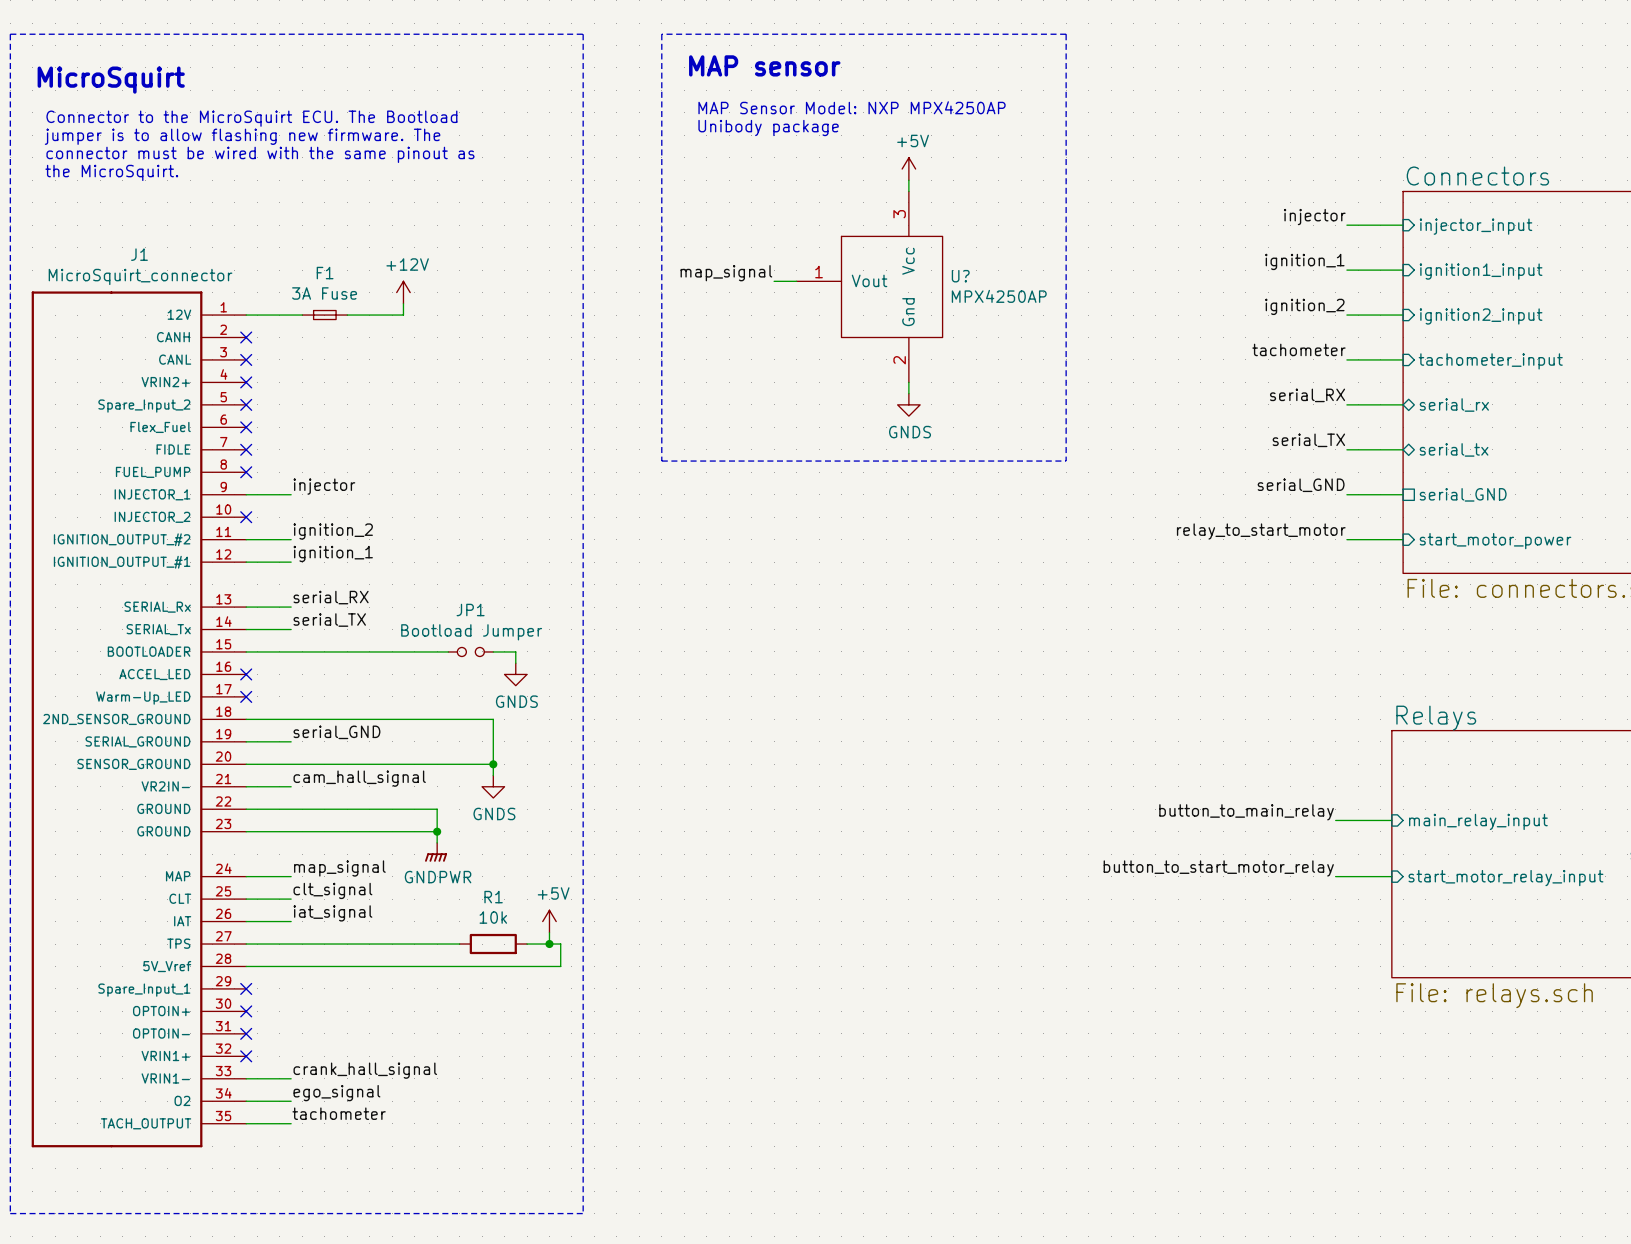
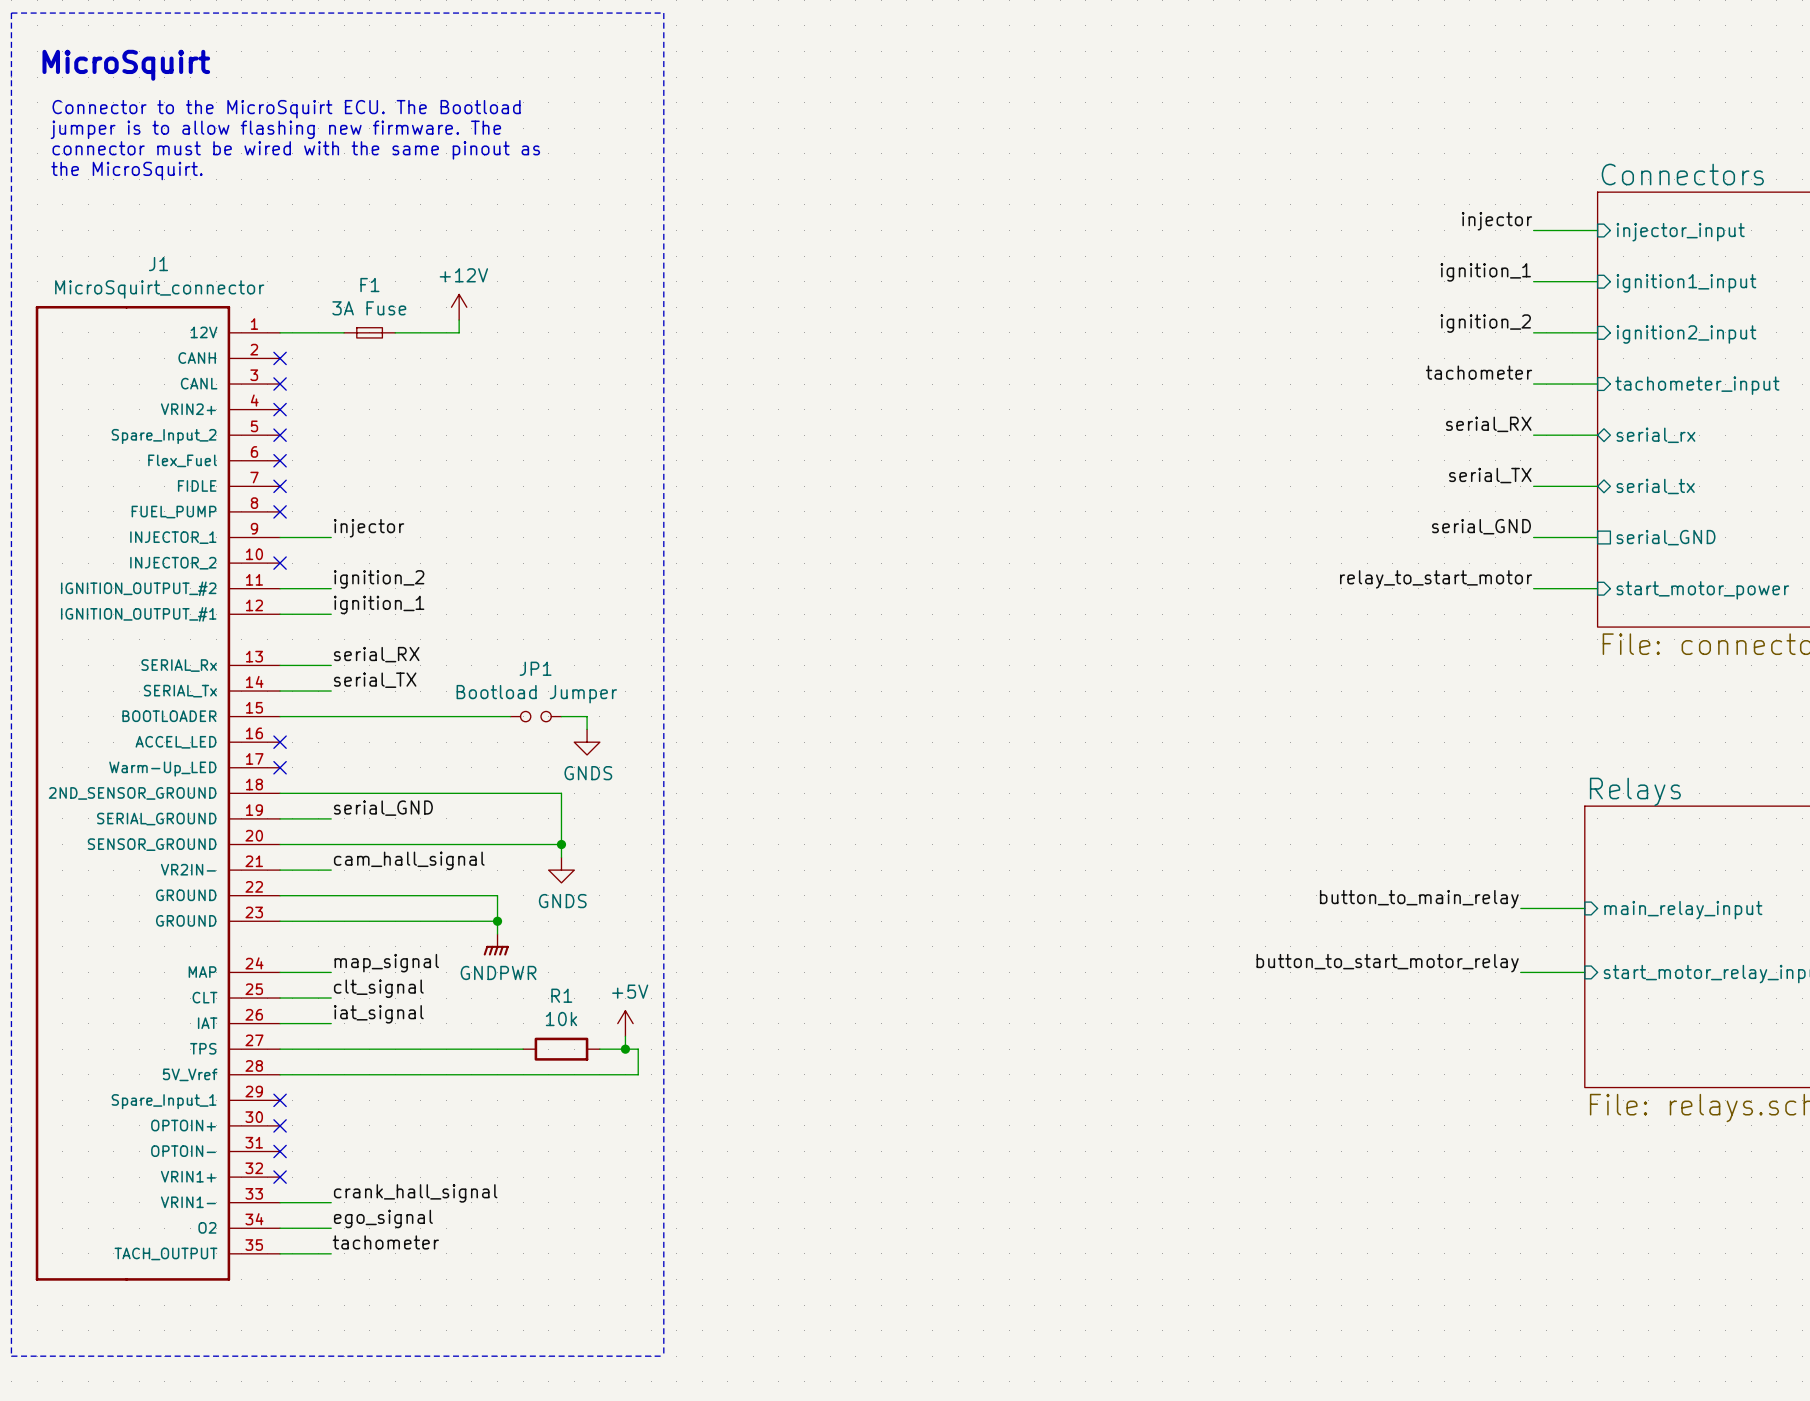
line: (661, 34) (1066, 34) (1066, 461) (661, 461) (661, 34) -> none
text: MAP sensor (764, 65) -> none
text: MAP Sensor Model: NXP MPX4250AP (852, 107) -> none
text: Unibody package (768, 127) -> none
power symbol: +5V (908, 169) -> none
wire: (908, 180) (908, 191) -> none
label: map_signal (726, 273) -> none
wire: (774, 281) (796, 281) -> none
U?: MPX4250AP (869, 286) -> none
wire: (908, 382) (908, 393) -> none
power symbol: GNDS (908, 404) -> none

